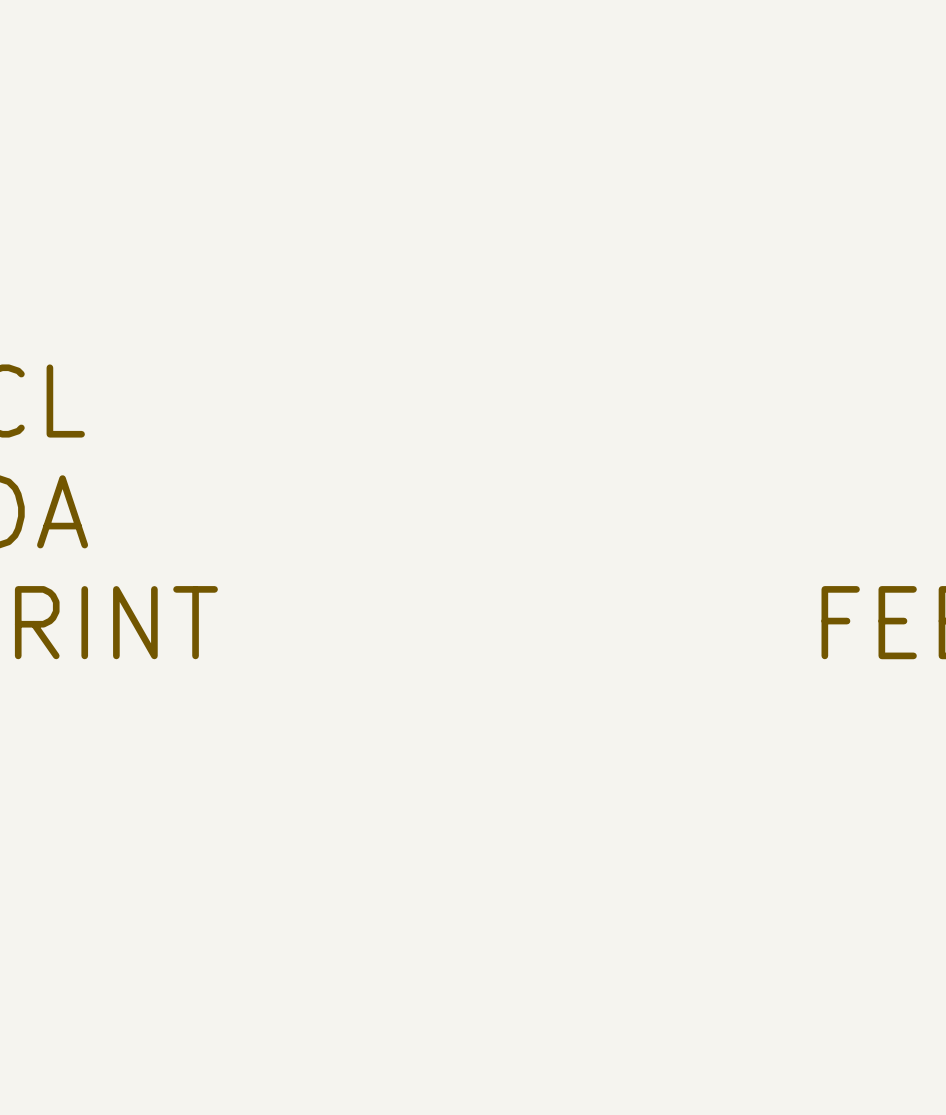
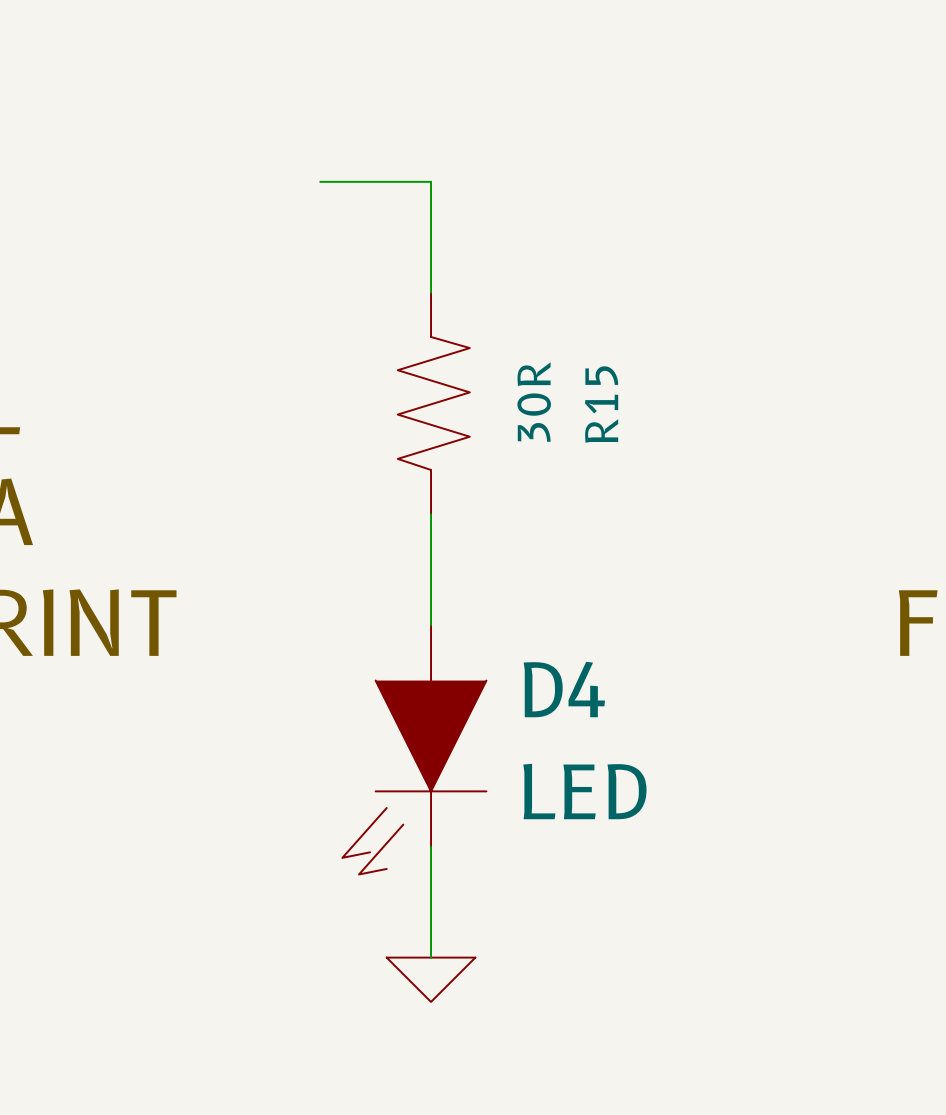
wire: none -> (320, 181) (431, 181) (431, 292)
R15: none -> 30R (433, 403)
wire: none -> (431, 514) (431, 625)
D4: none -> LED (414, 749)
wire: none -> (431, 846) (431, 957)
power symbol: none -> (431, 979)

